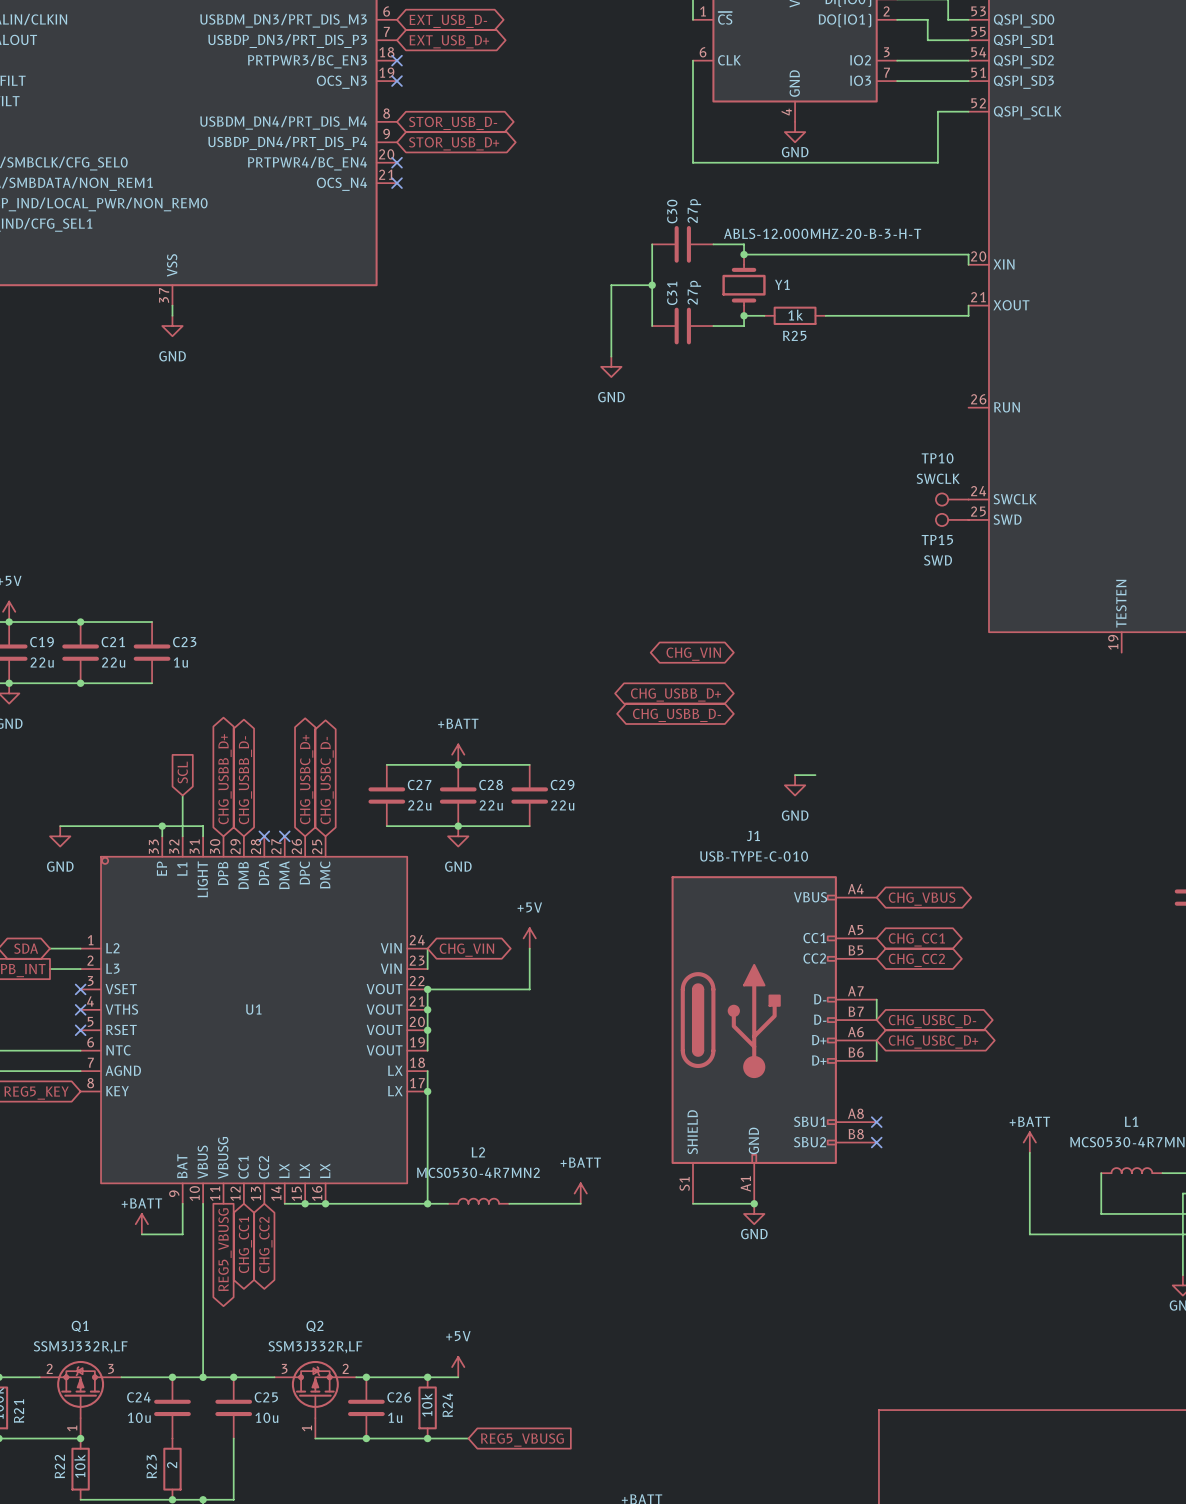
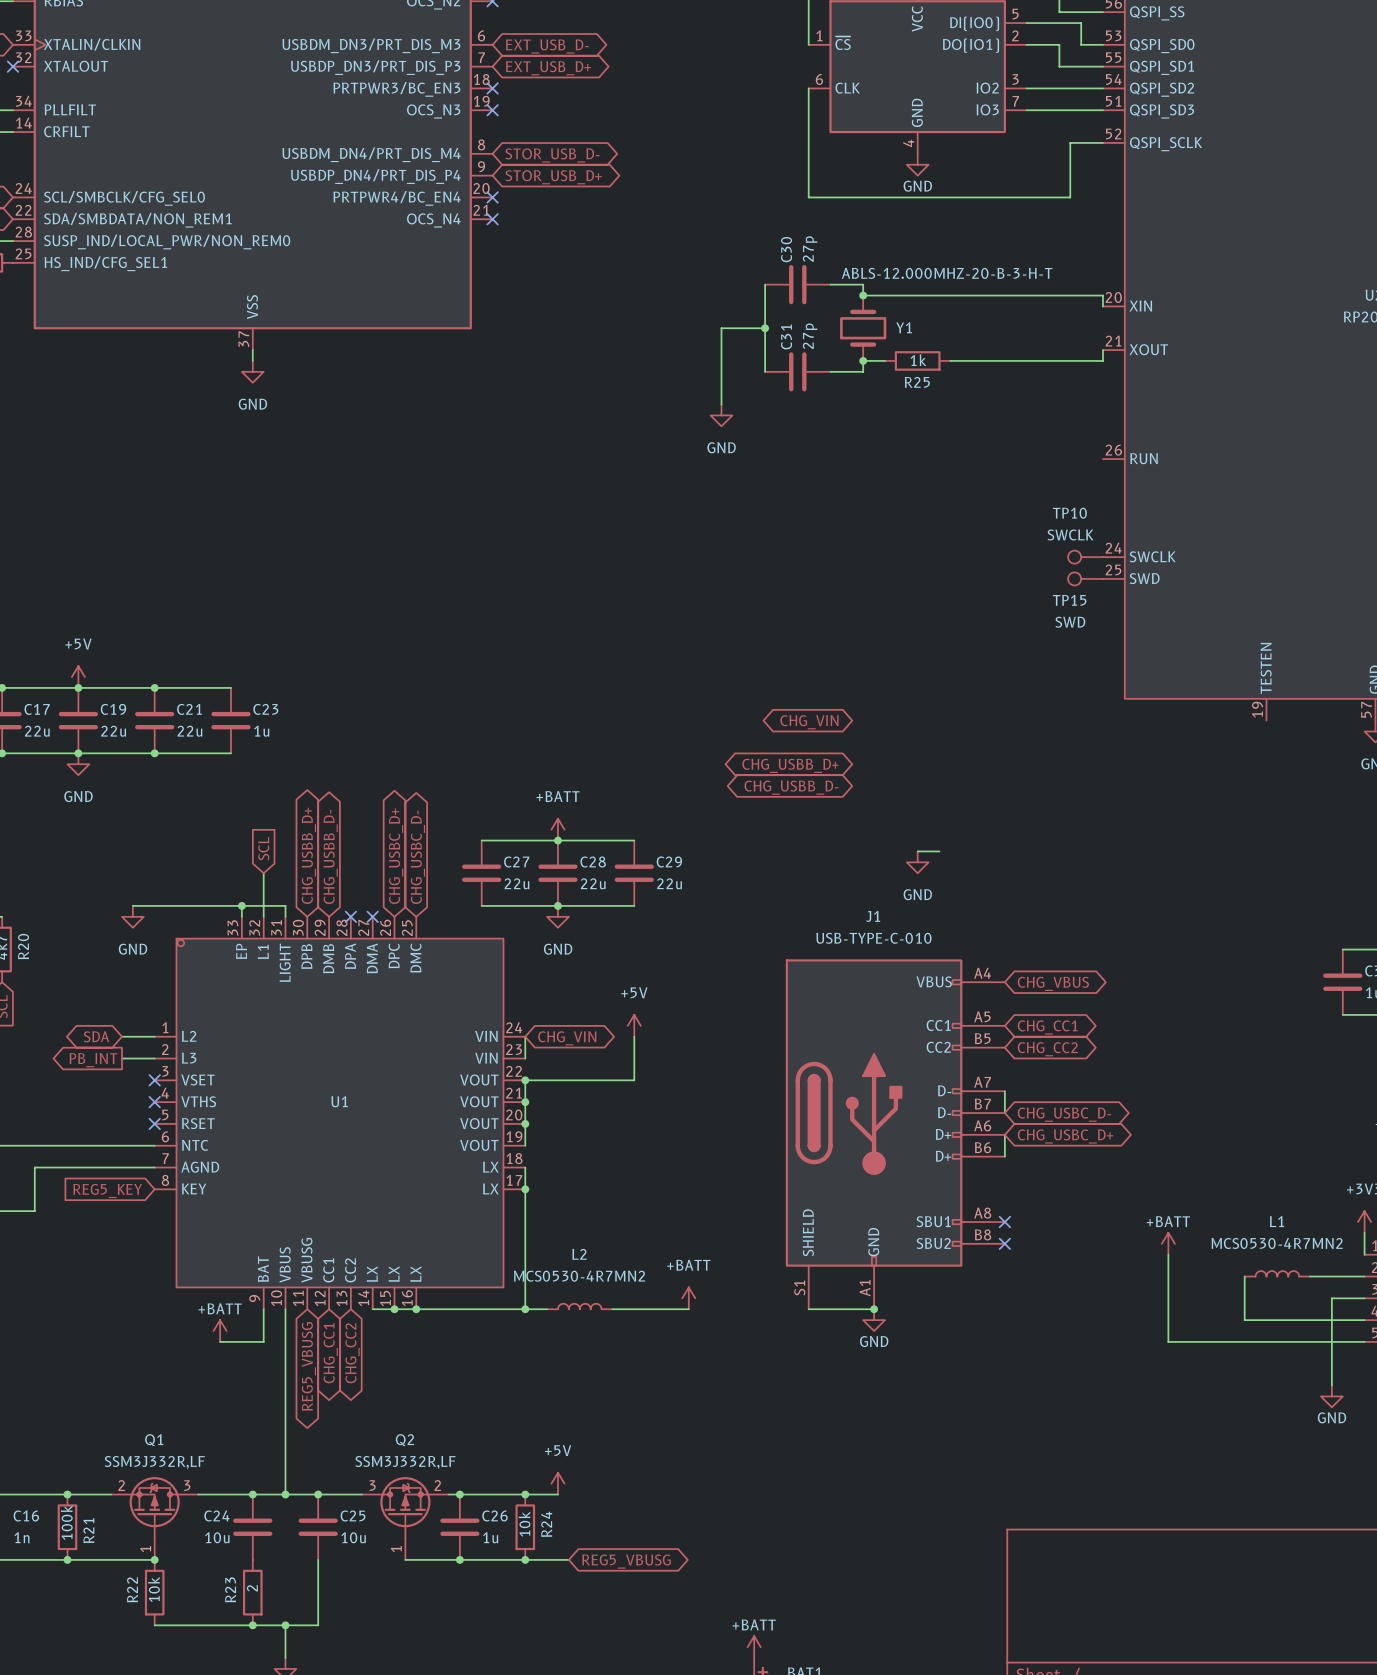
global label shape: output (225, 1249) -> bidirectional (308, 1366)
global label shape: input (522, 1440) -> bidirectional (626, 1561)

